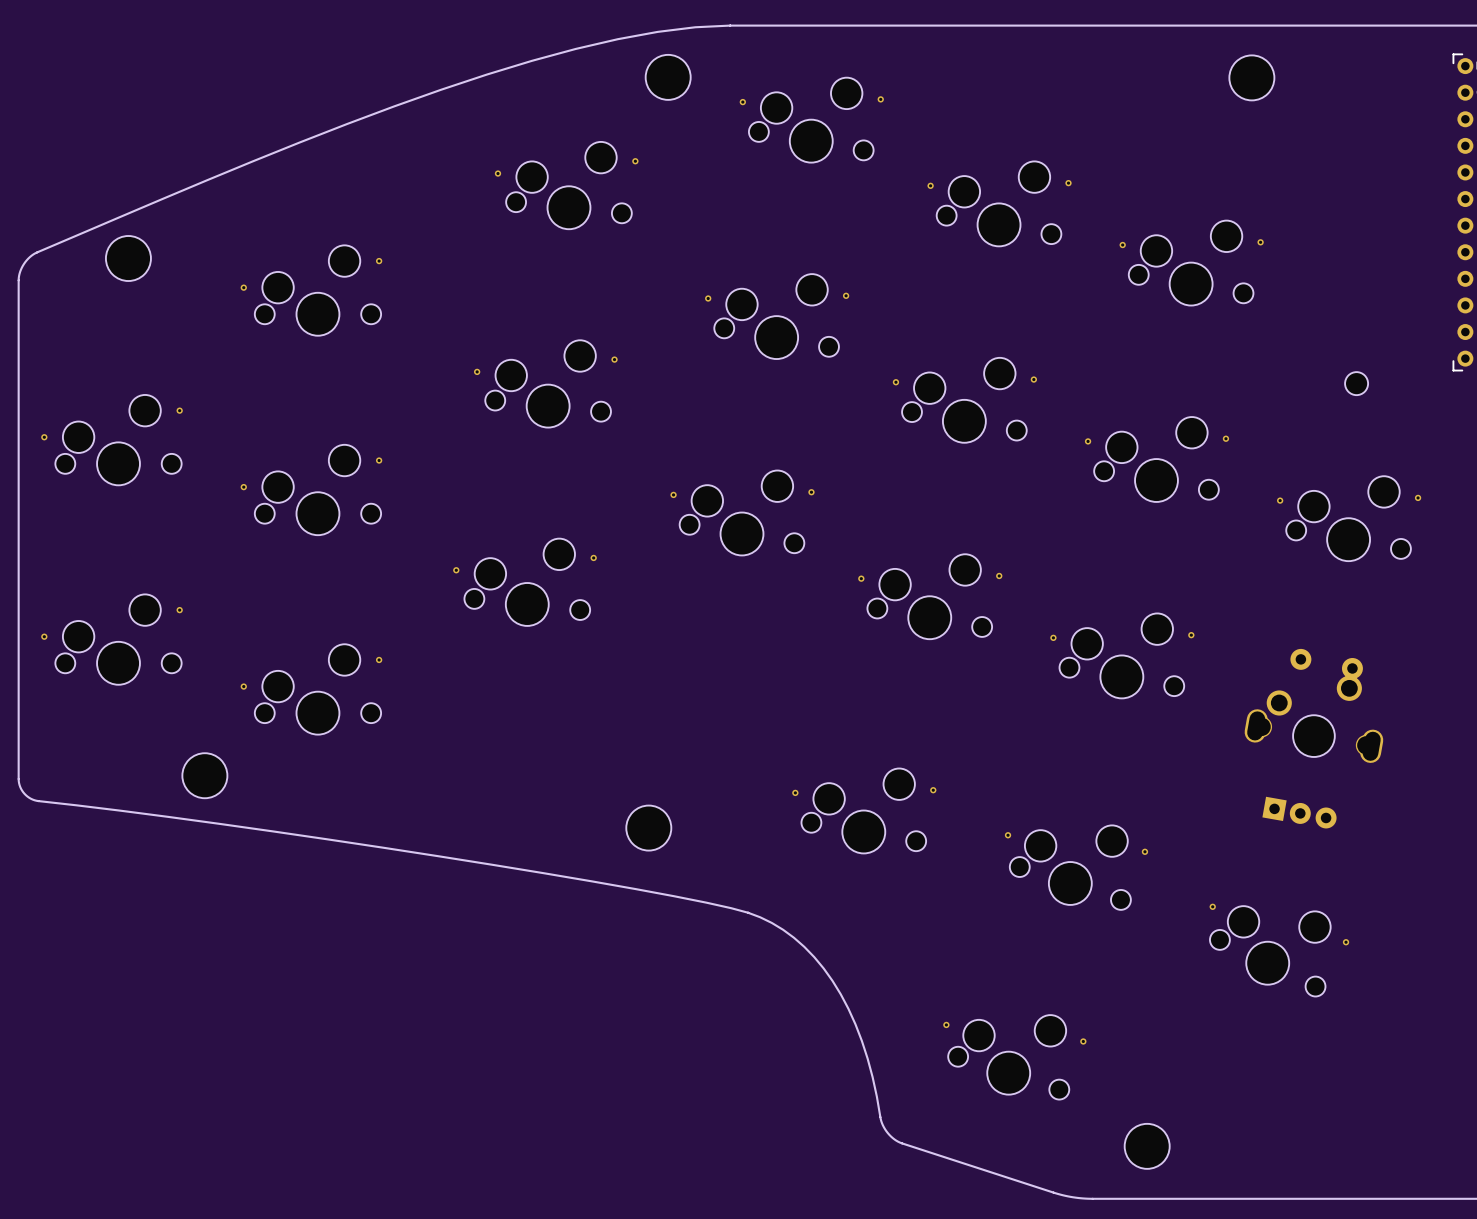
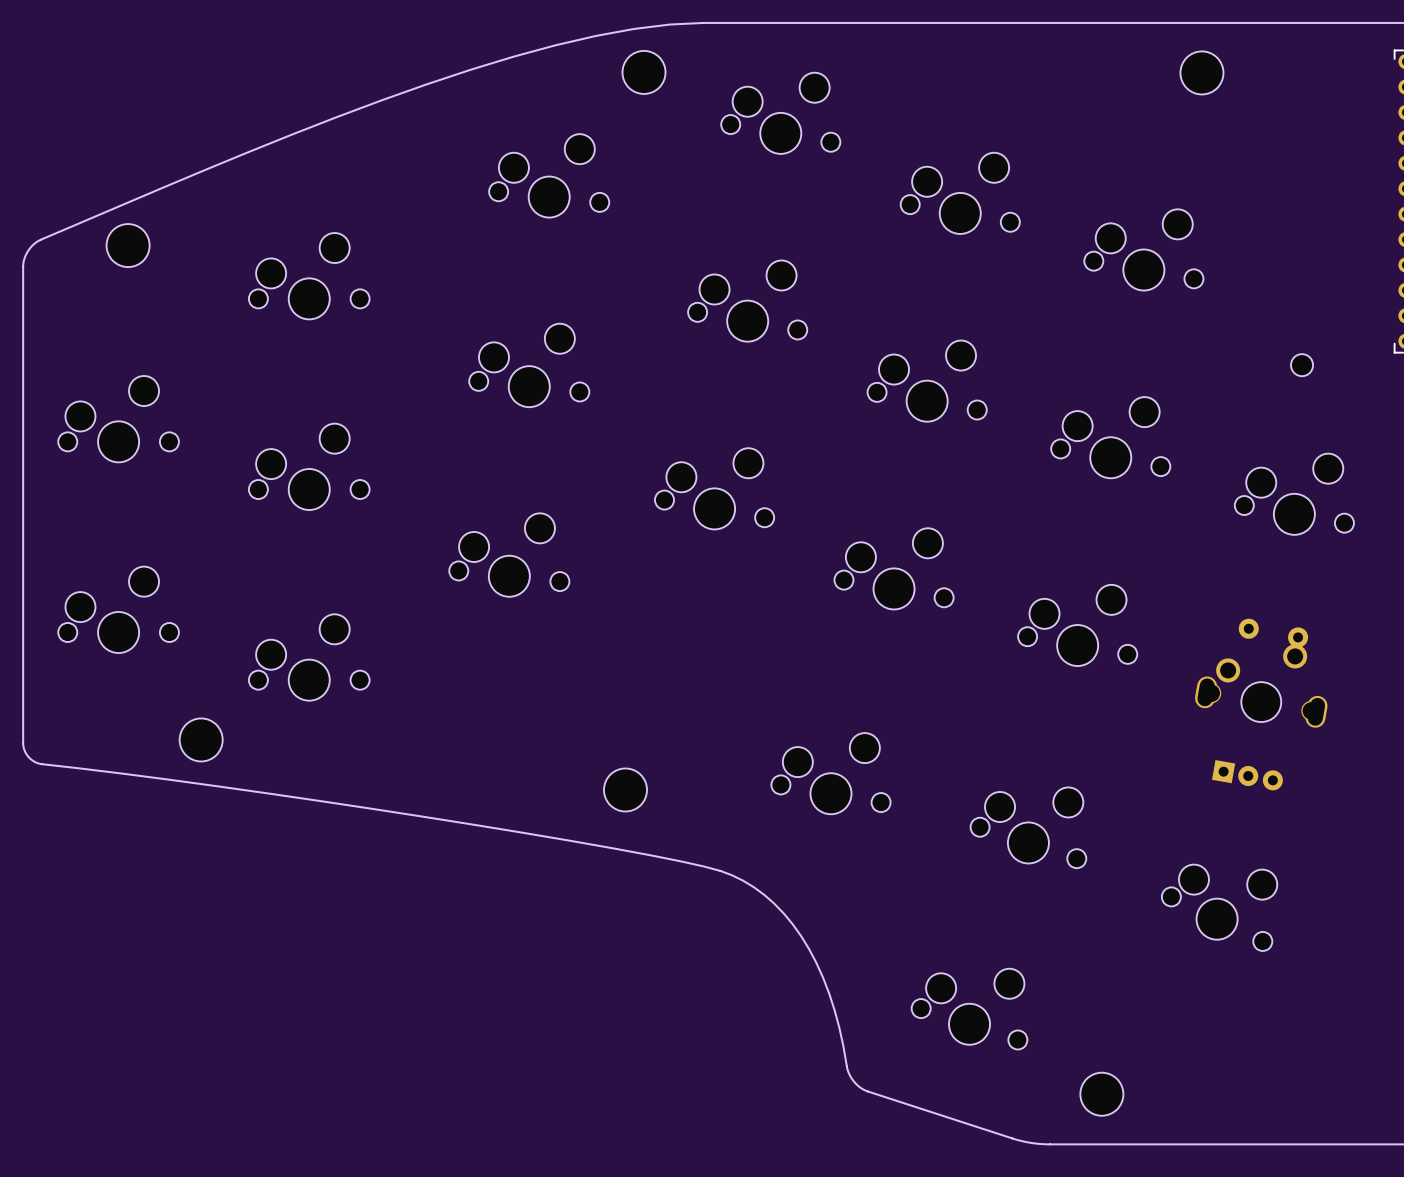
part footprint: [739, 77, 884, 163] -> [721, 72, 841, 154]
part footprint: [494, 141, 639, 230] -> [489, 134, 610, 218]
part footprint: [927, 161, 1072, 247] -> [900, 152, 1020, 234]
part footprint: [1119, 220, 1264, 306] -> [1084, 209, 1204, 291]
part footprint: [240, 245, 383, 336] -> [248, 233, 370, 320]
part footprint: [705, 274, 850, 360] -> [688, 260, 808, 342]
part footprint: [474, 340, 618, 428] -> [469, 323, 590, 408]
part footprint: [892, 357, 1038, 443] -> [867, 340, 987, 422]
part footprint: [41, 394, 183, 486] -> [58, 375, 179, 463]
part footprint: [1084, 417, 1230, 502] -> [1051, 397, 1171, 479]
part footprint: [240, 444, 383, 536] -> [248, 423, 370, 511]
part footprint: [670, 470, 815, 556] -> [654, 448, 775, 530]
part footprint: [1277, 476, 1422, 562] -> [1234, 453, 1354, 535]
part footprint: [453, 538, 597, 626] -> [449, 513, 570, 597]
part footprint: [858, 554, 1003, 640] -> [834, 528, 954, 610]
part footprint: [41, 594, 183, 685] -> [58, 566, 179, 654]
part footprint: [1050, 613, 1195, 699] -> [1018, 584, 1138, 667]
part footprint: [240, 644, 383, 735] -> [248, 614, 370, 701]
part footprint: [792, 768, 937, 854] -> [771, 733, 891, 815]
part footprint: [1004, 825, 1149, 910] -> [970, 787, 1087, 869]
part footprint: [1209, 903, 1350, 997] -> [1161, 864, 1278, 951]
part footprint: [943, 1015, 1087, 1100] -> [911, 968, 1028, 1050]

